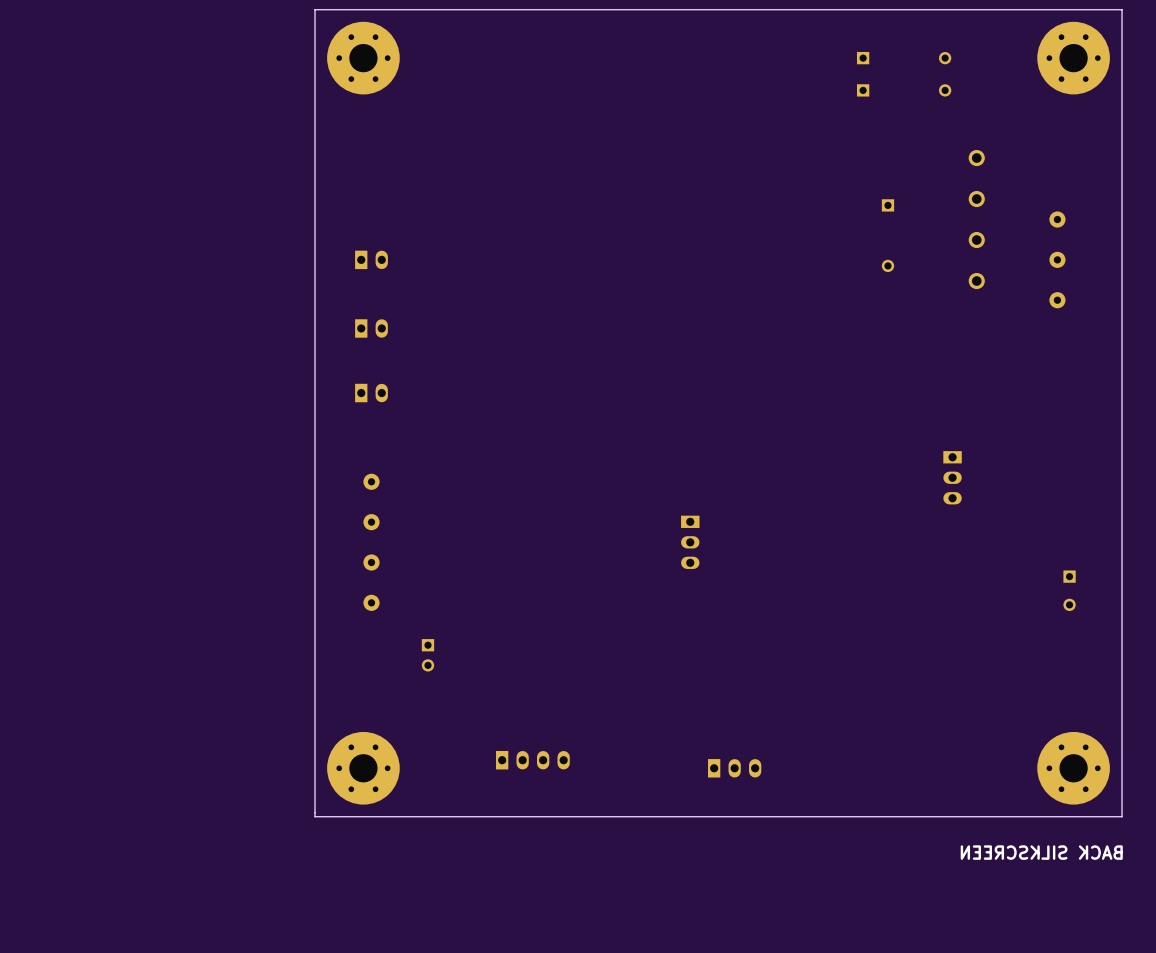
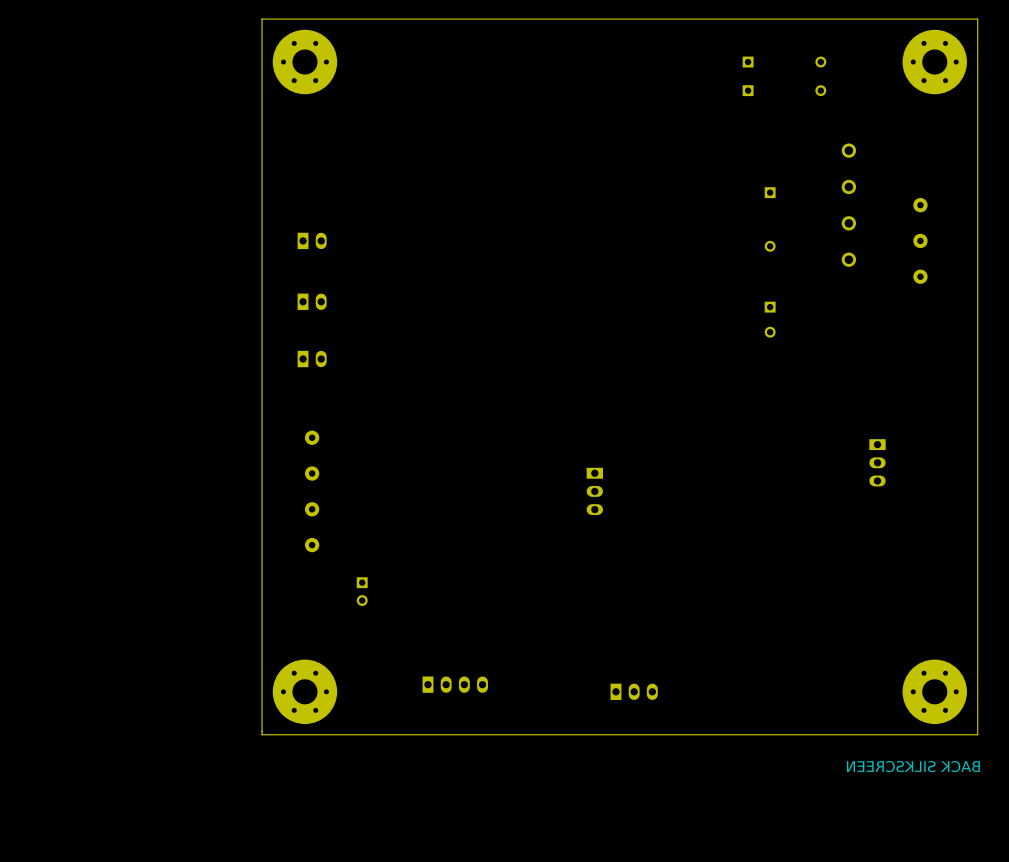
part: none -> (770, 319)
part position: (952, 477) -> (877, 462)
part: (1069, 590) -> none

